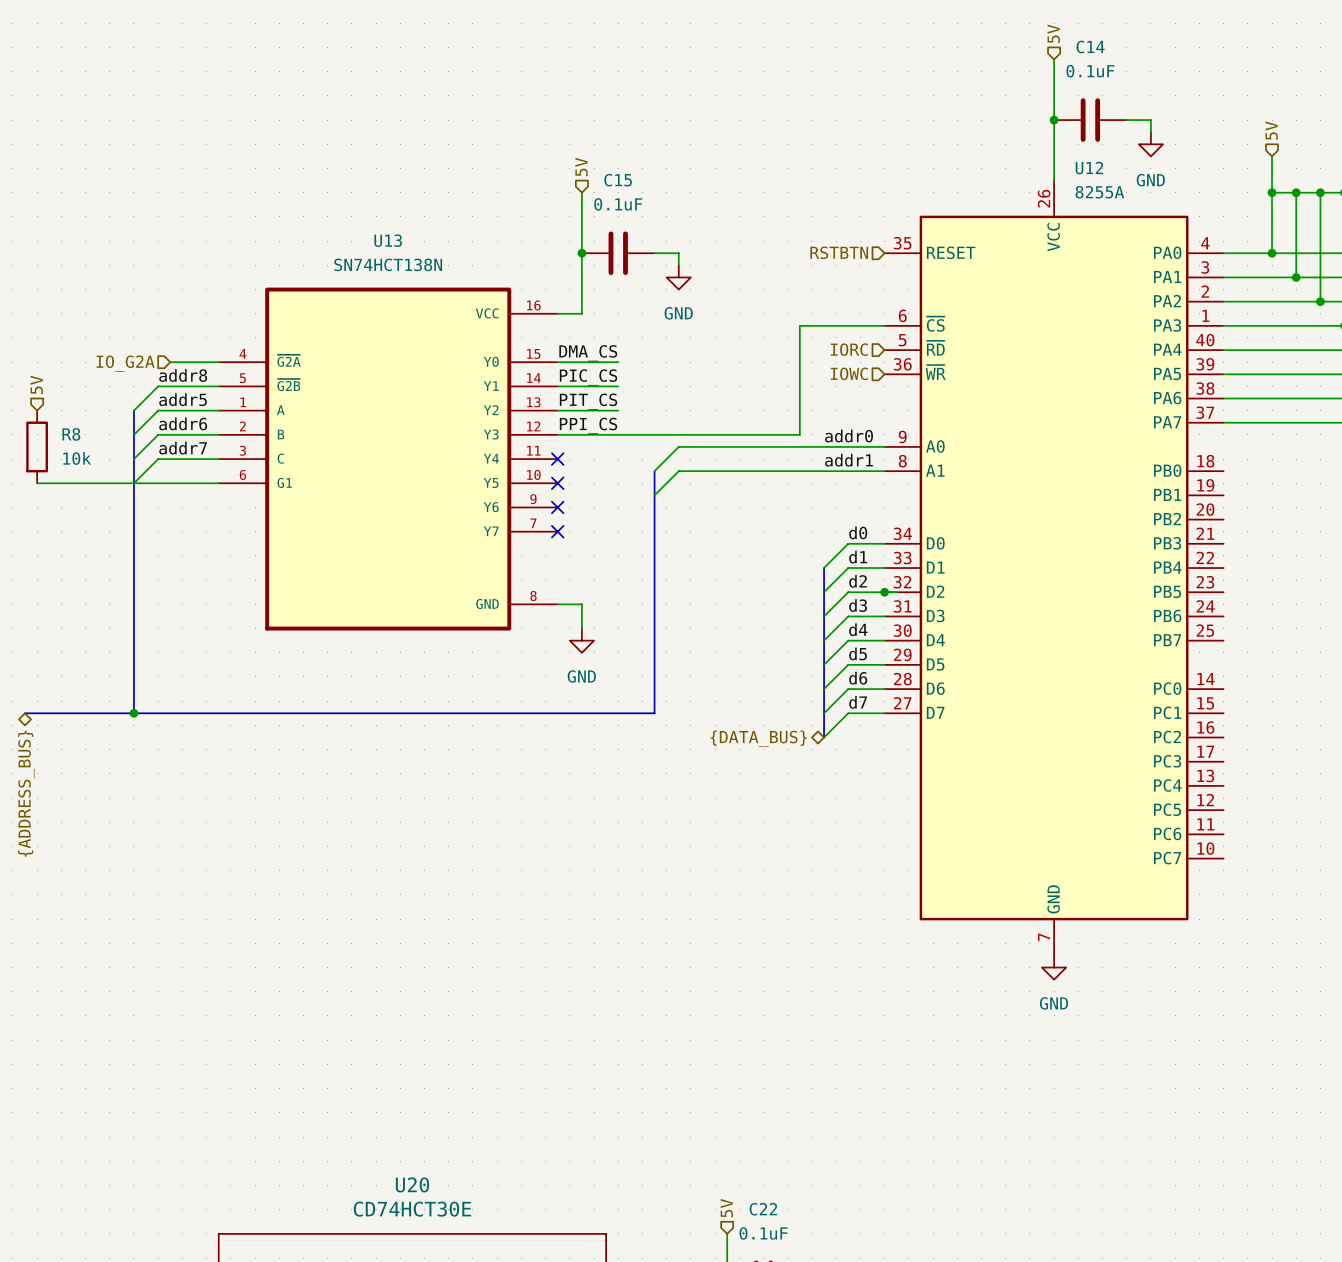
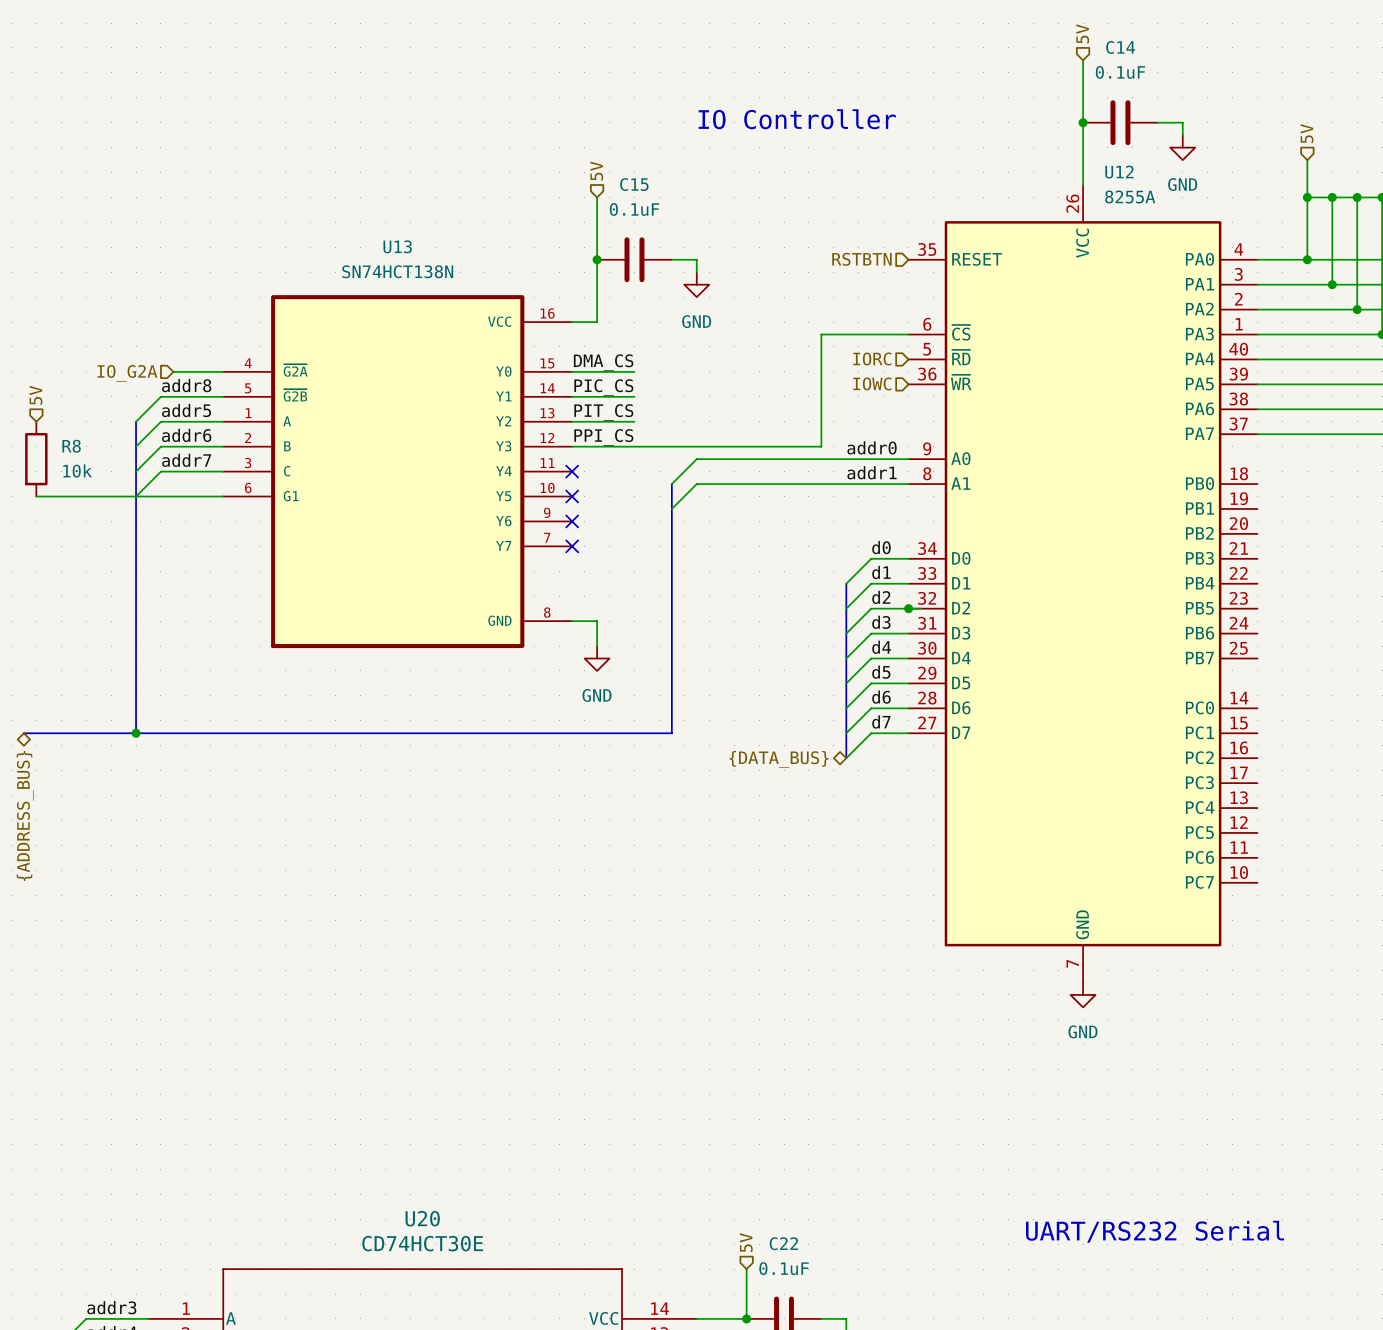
text: none -> IO Controller (797, 119)
text: none -> UART/RS232 Serial (1155, 1231)

